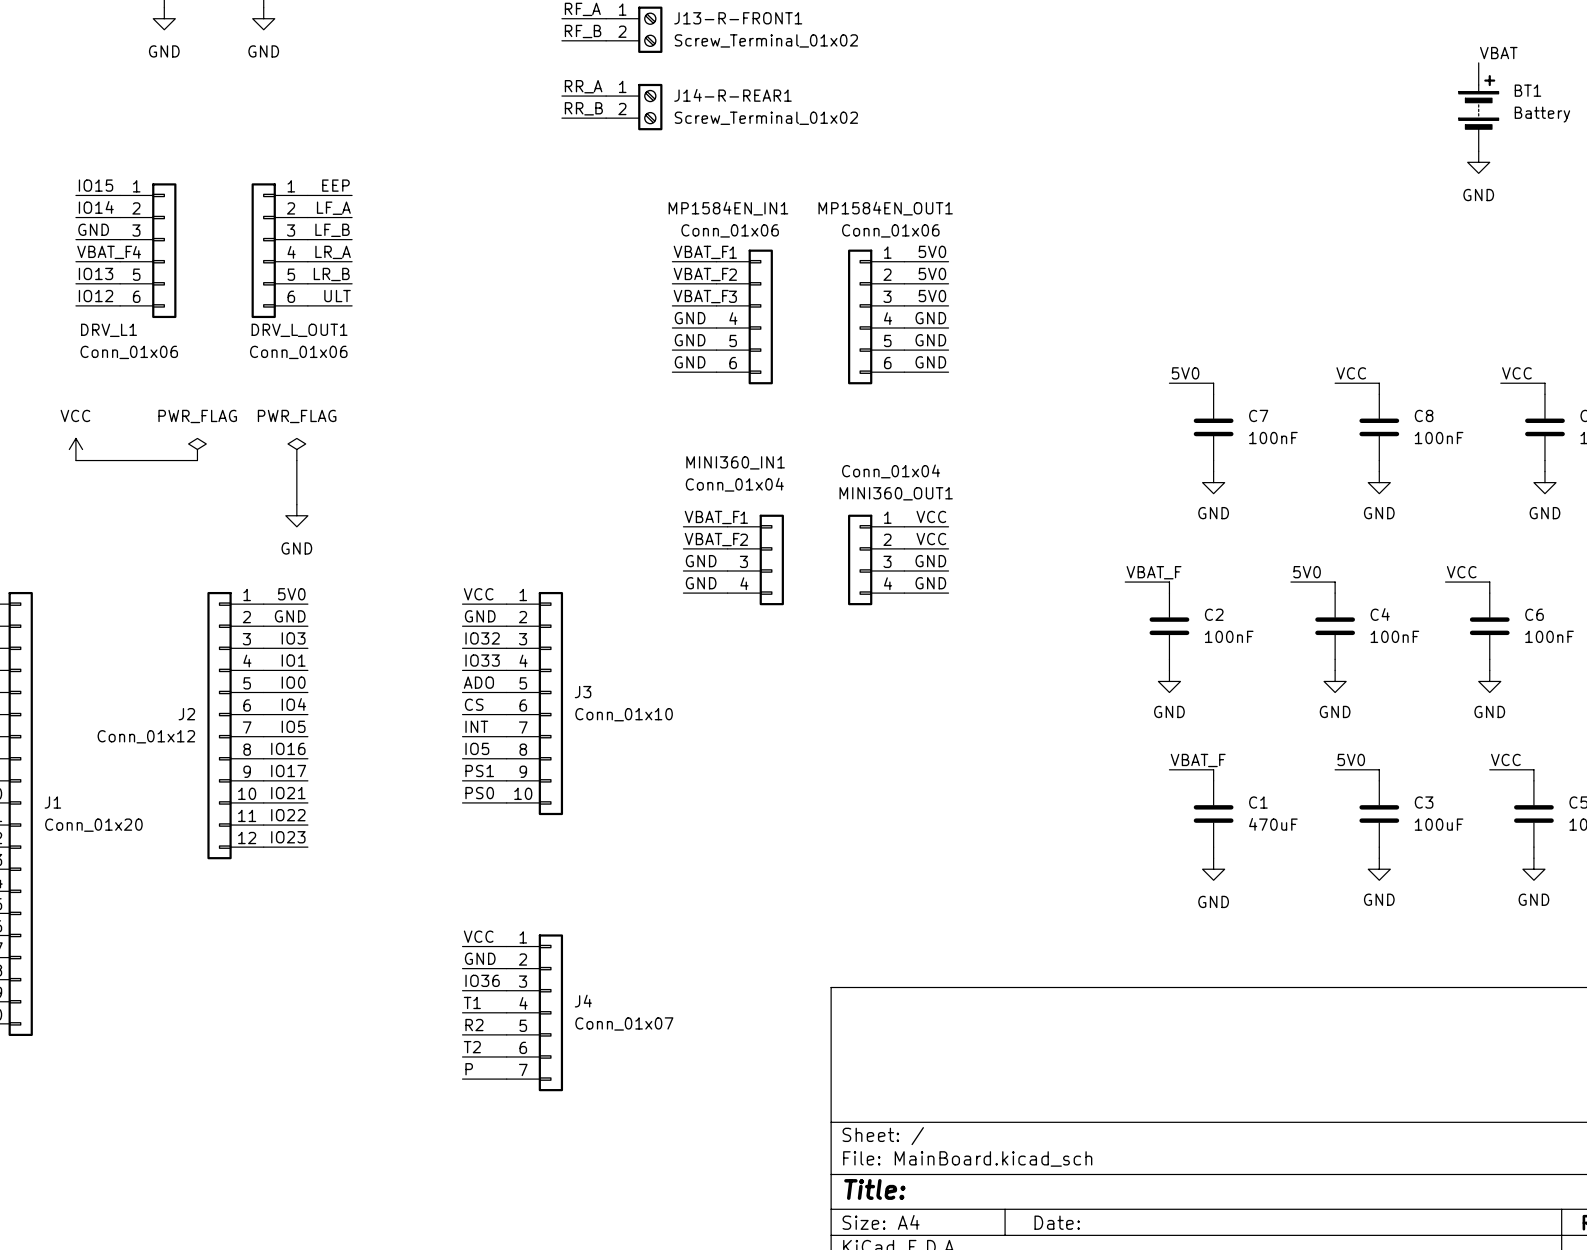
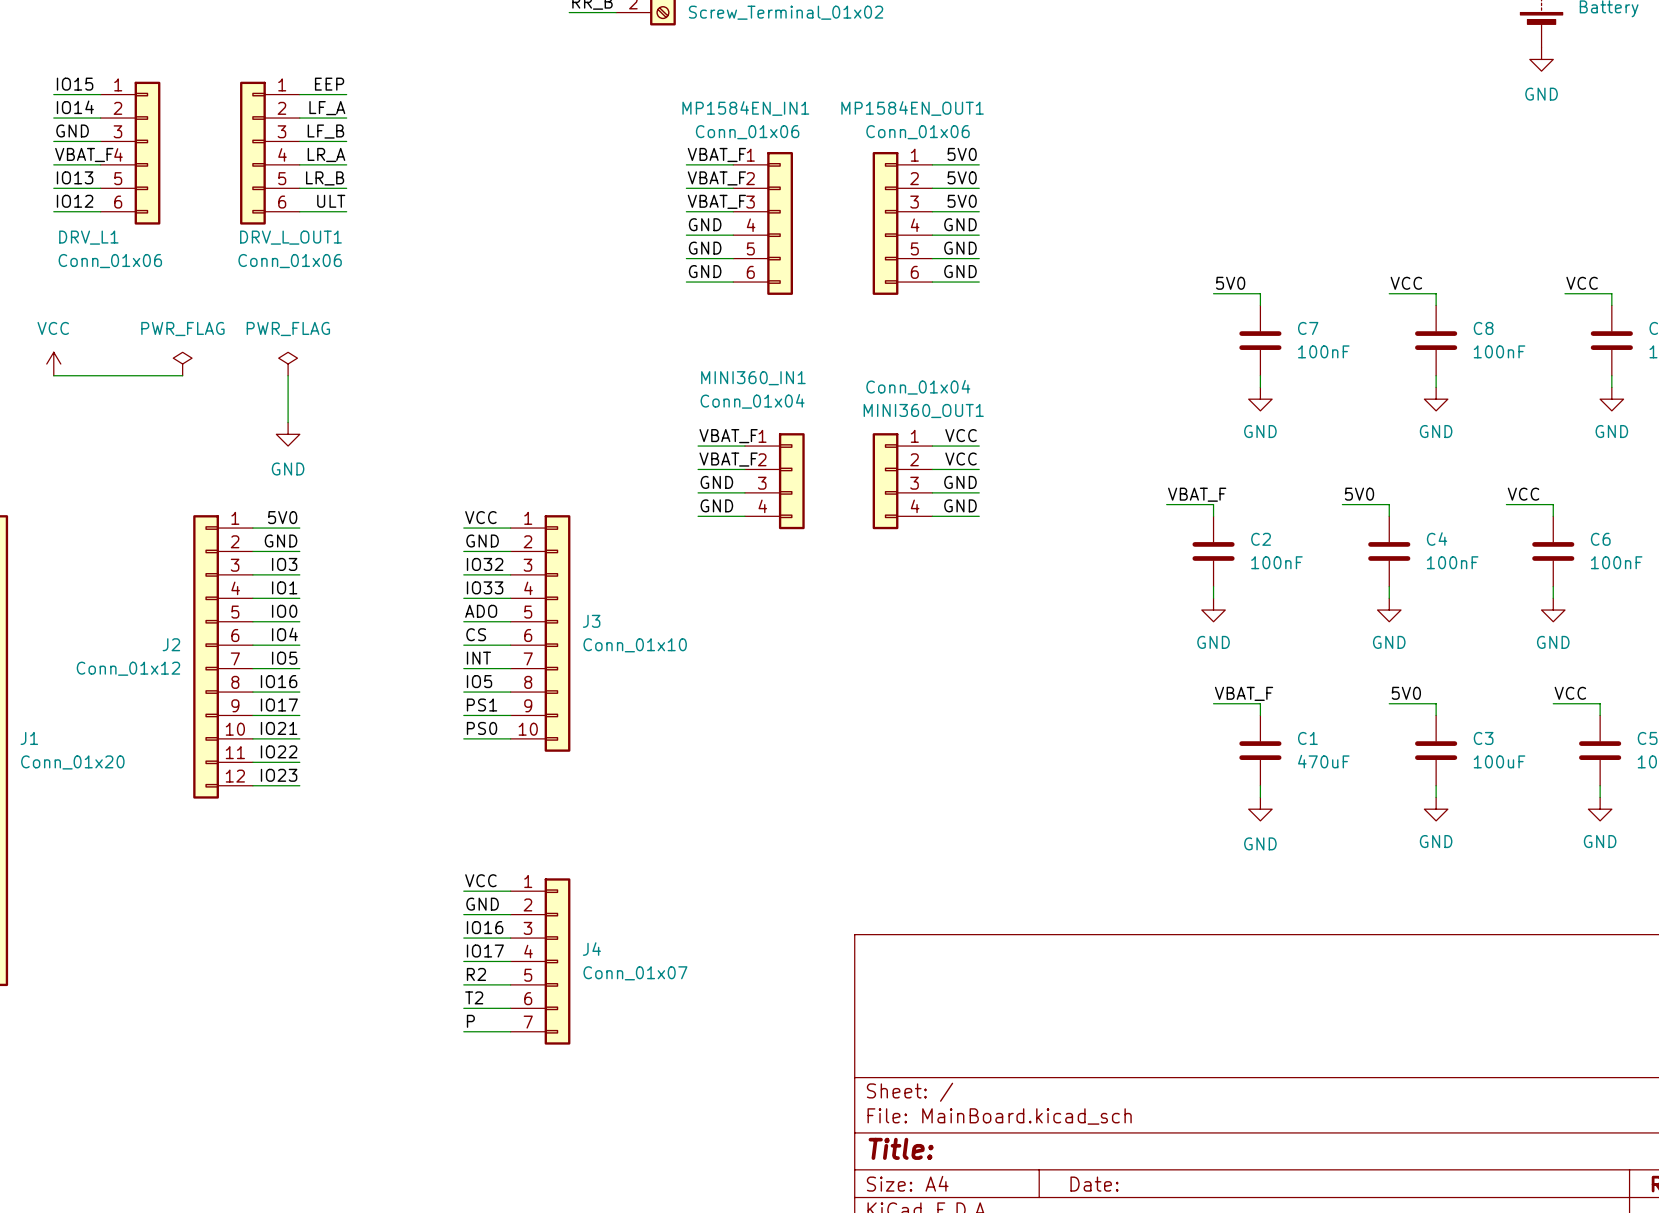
label: IO36 (482, 980) -> IO16 (485, 927)
label: T1 (472, 1002) -> IO17 (485, 951)

